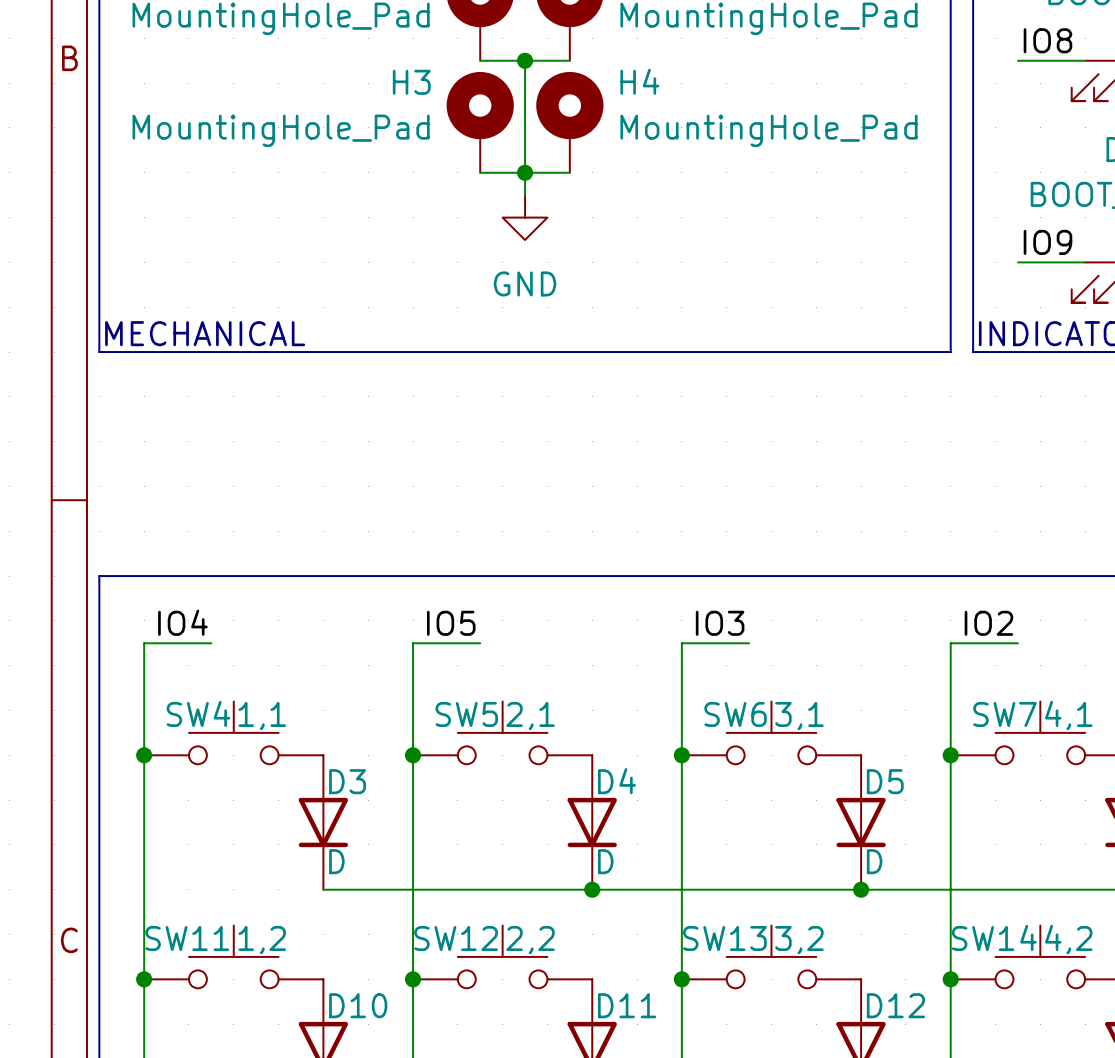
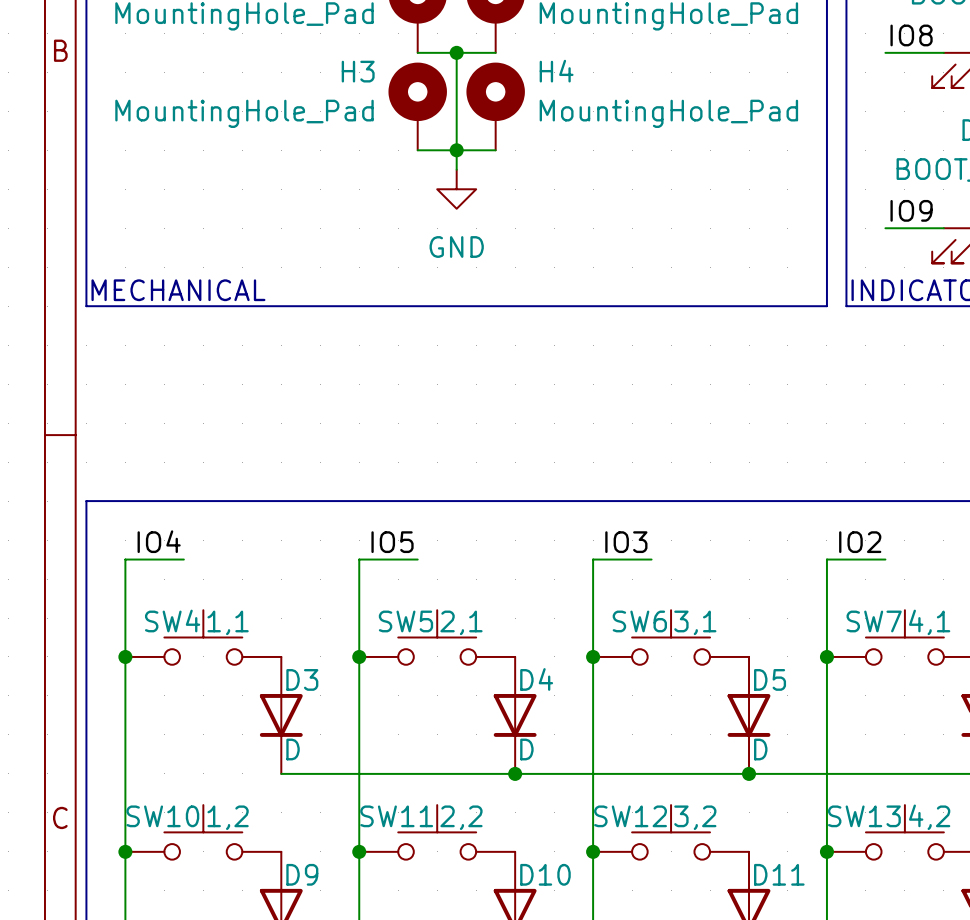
SW14 name: SW14 (994, 937) -> SW13 (864, 816)
SW11 name: SW11 (187, 938) -> SW10 (162, 816)
SW12 name: SW12 (456, 938) -> SW11 (396, 816)
SW13 name: SW13 (724, 938) -> SW12 (630, 816)
D10 name: D10 (358, 1005) -> D9 (302, 874)
D11 name: D11 (627, 1005) -> D10 (545, 874)
D12 name: D12 (895, 1005) -> D11 (779, 874)

